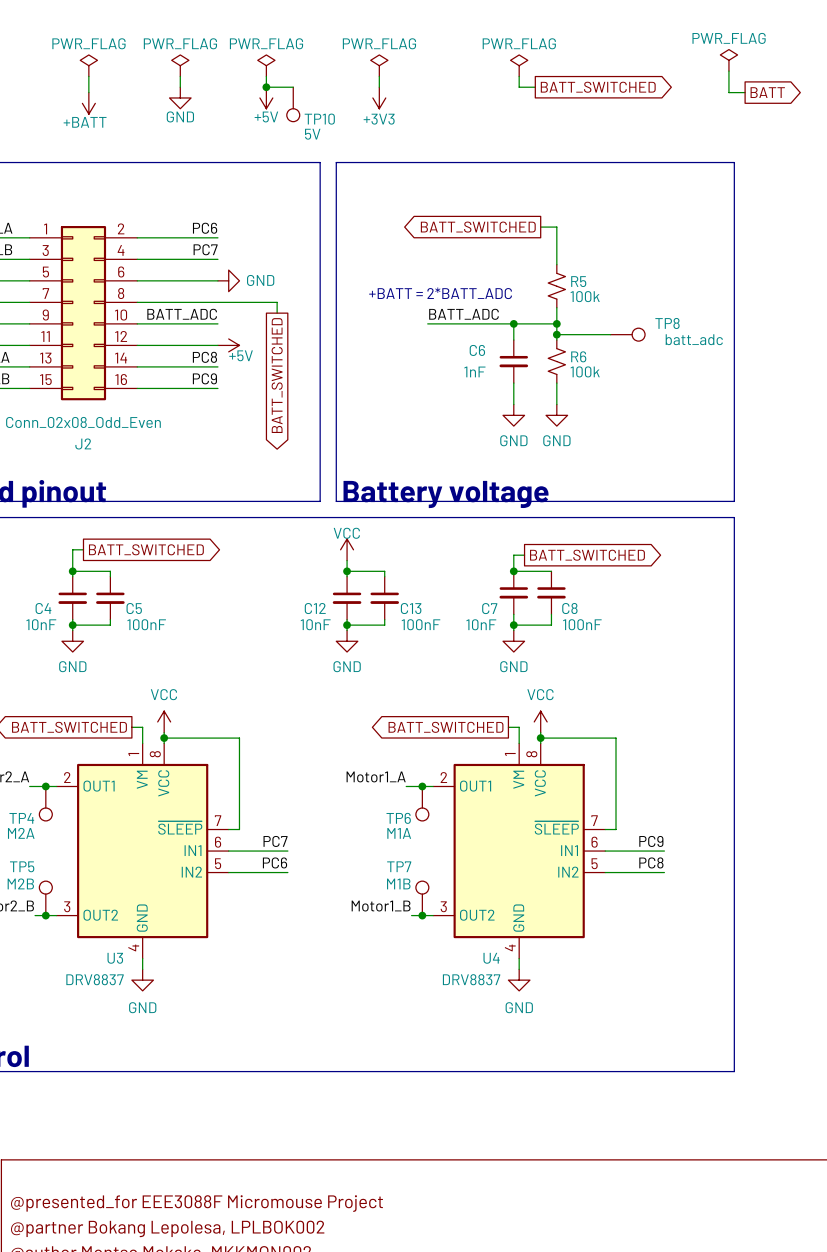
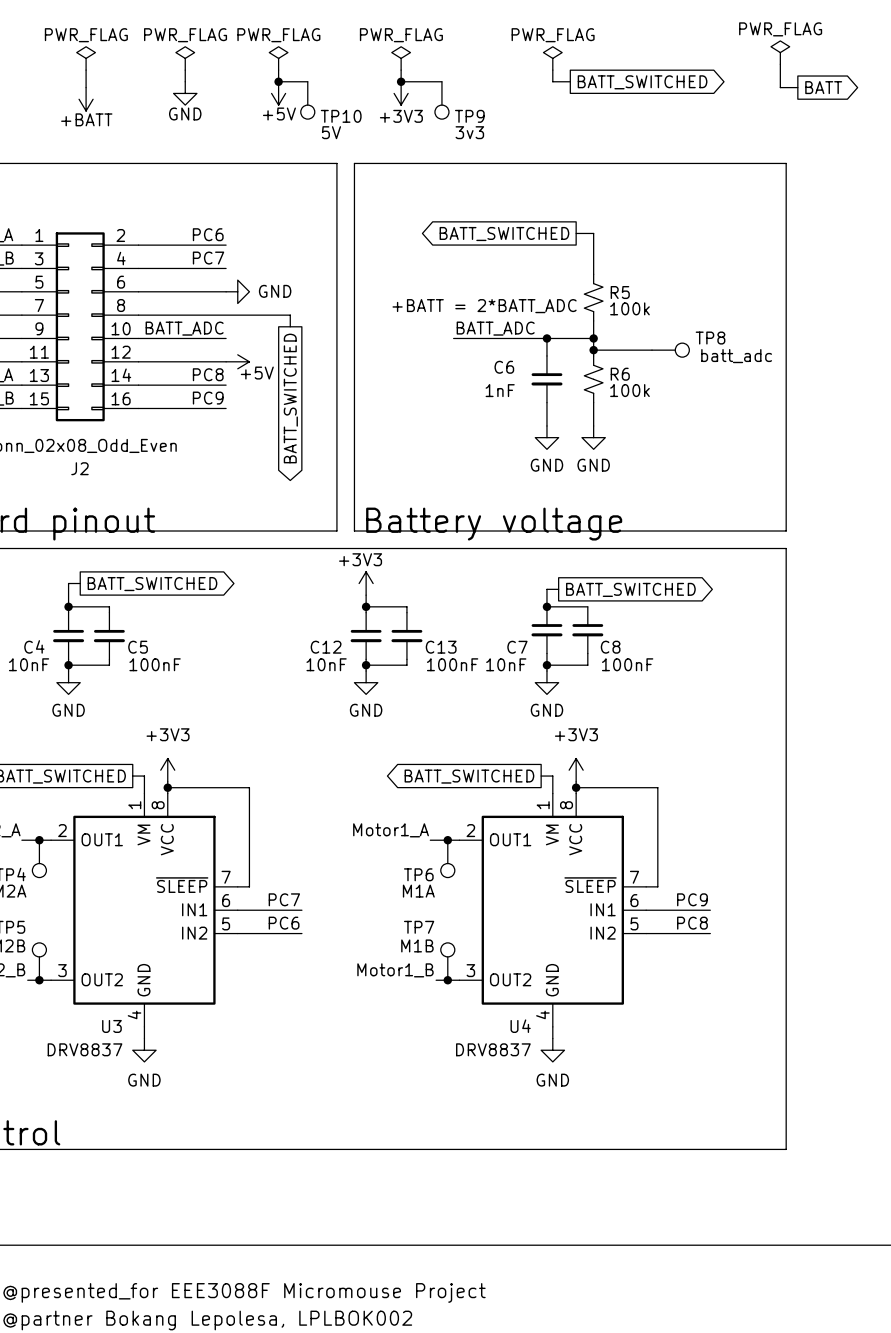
wire: none -> (401, 81) (441, 81)
junction: none -> (401, 81)
TP9: none -> 3v3 (441, 100)
power symbol: VCC (347, 549) -> +3V3 (366, 583)
power symbol: VCC (164, 721) -> +3V3 (167, 770)
power symbol: VCC (540, 721) -> +3V3 (576, 770)

